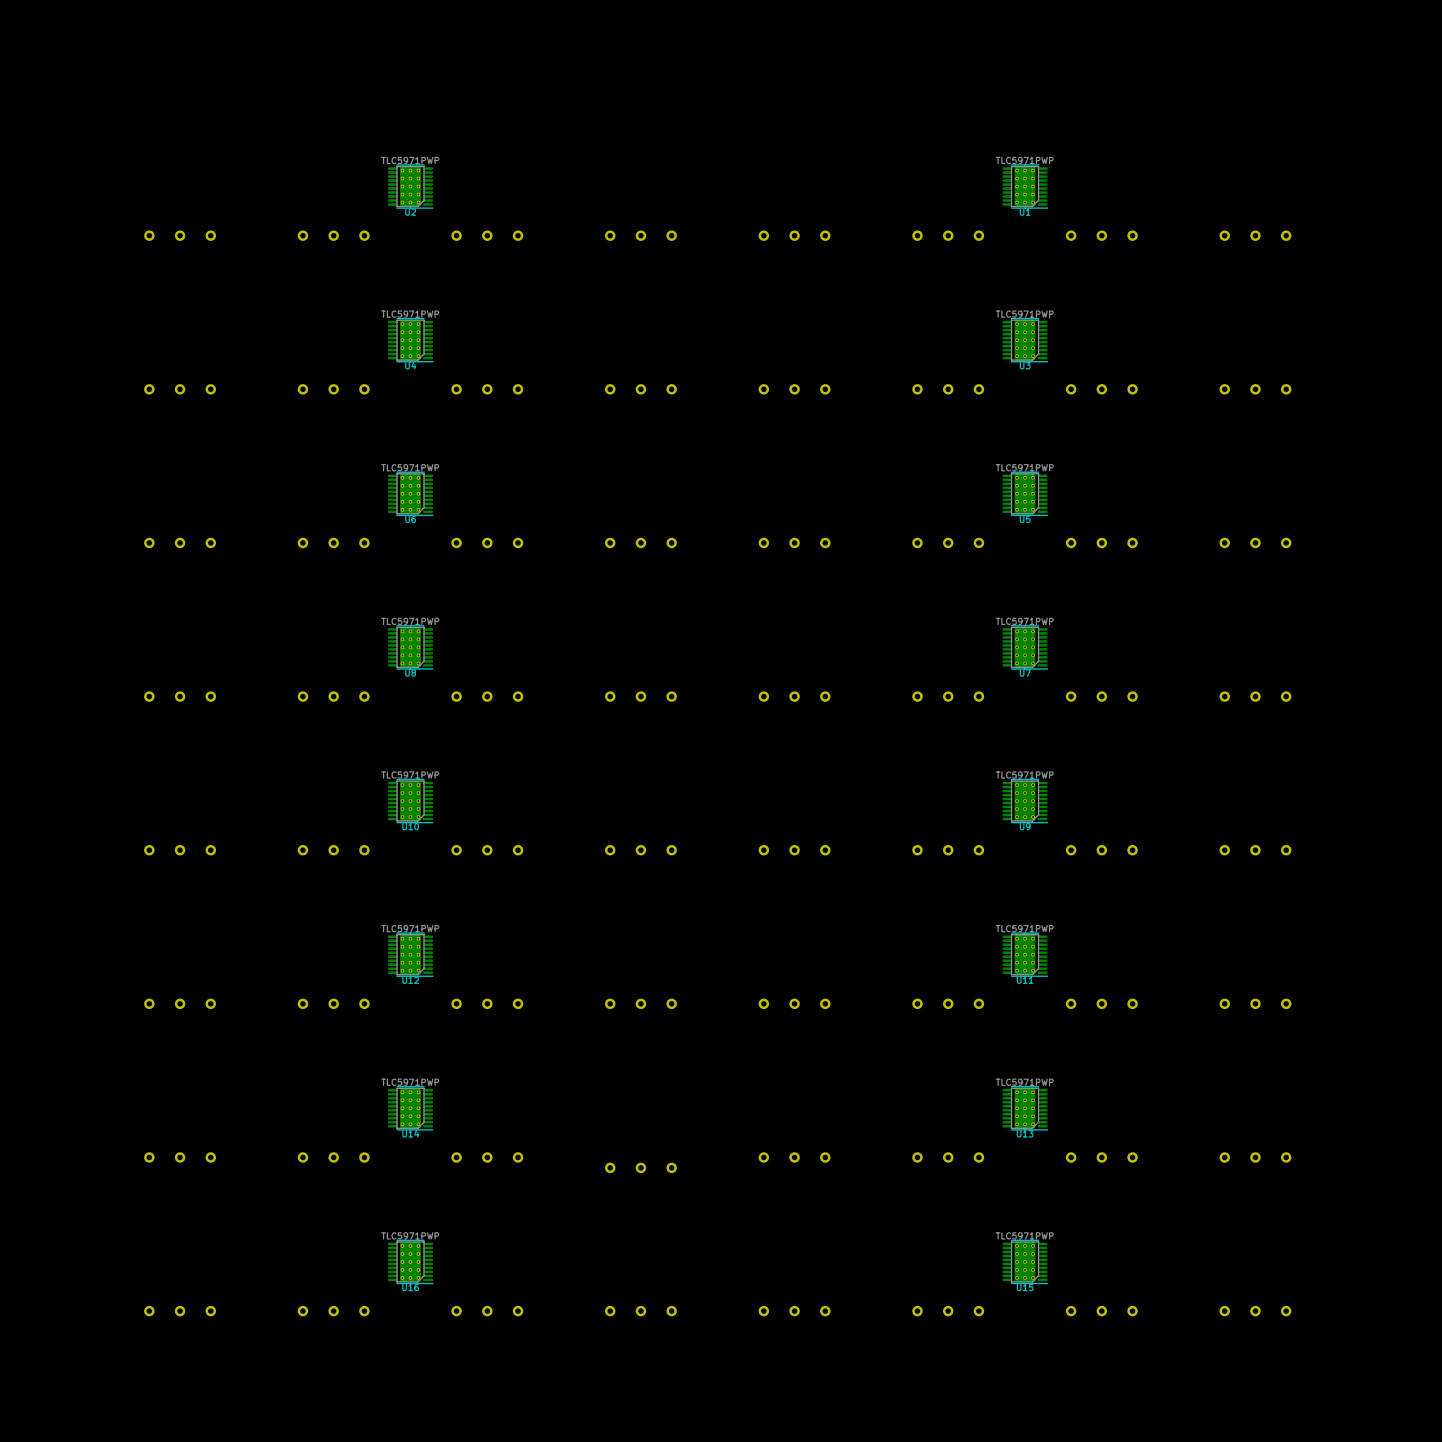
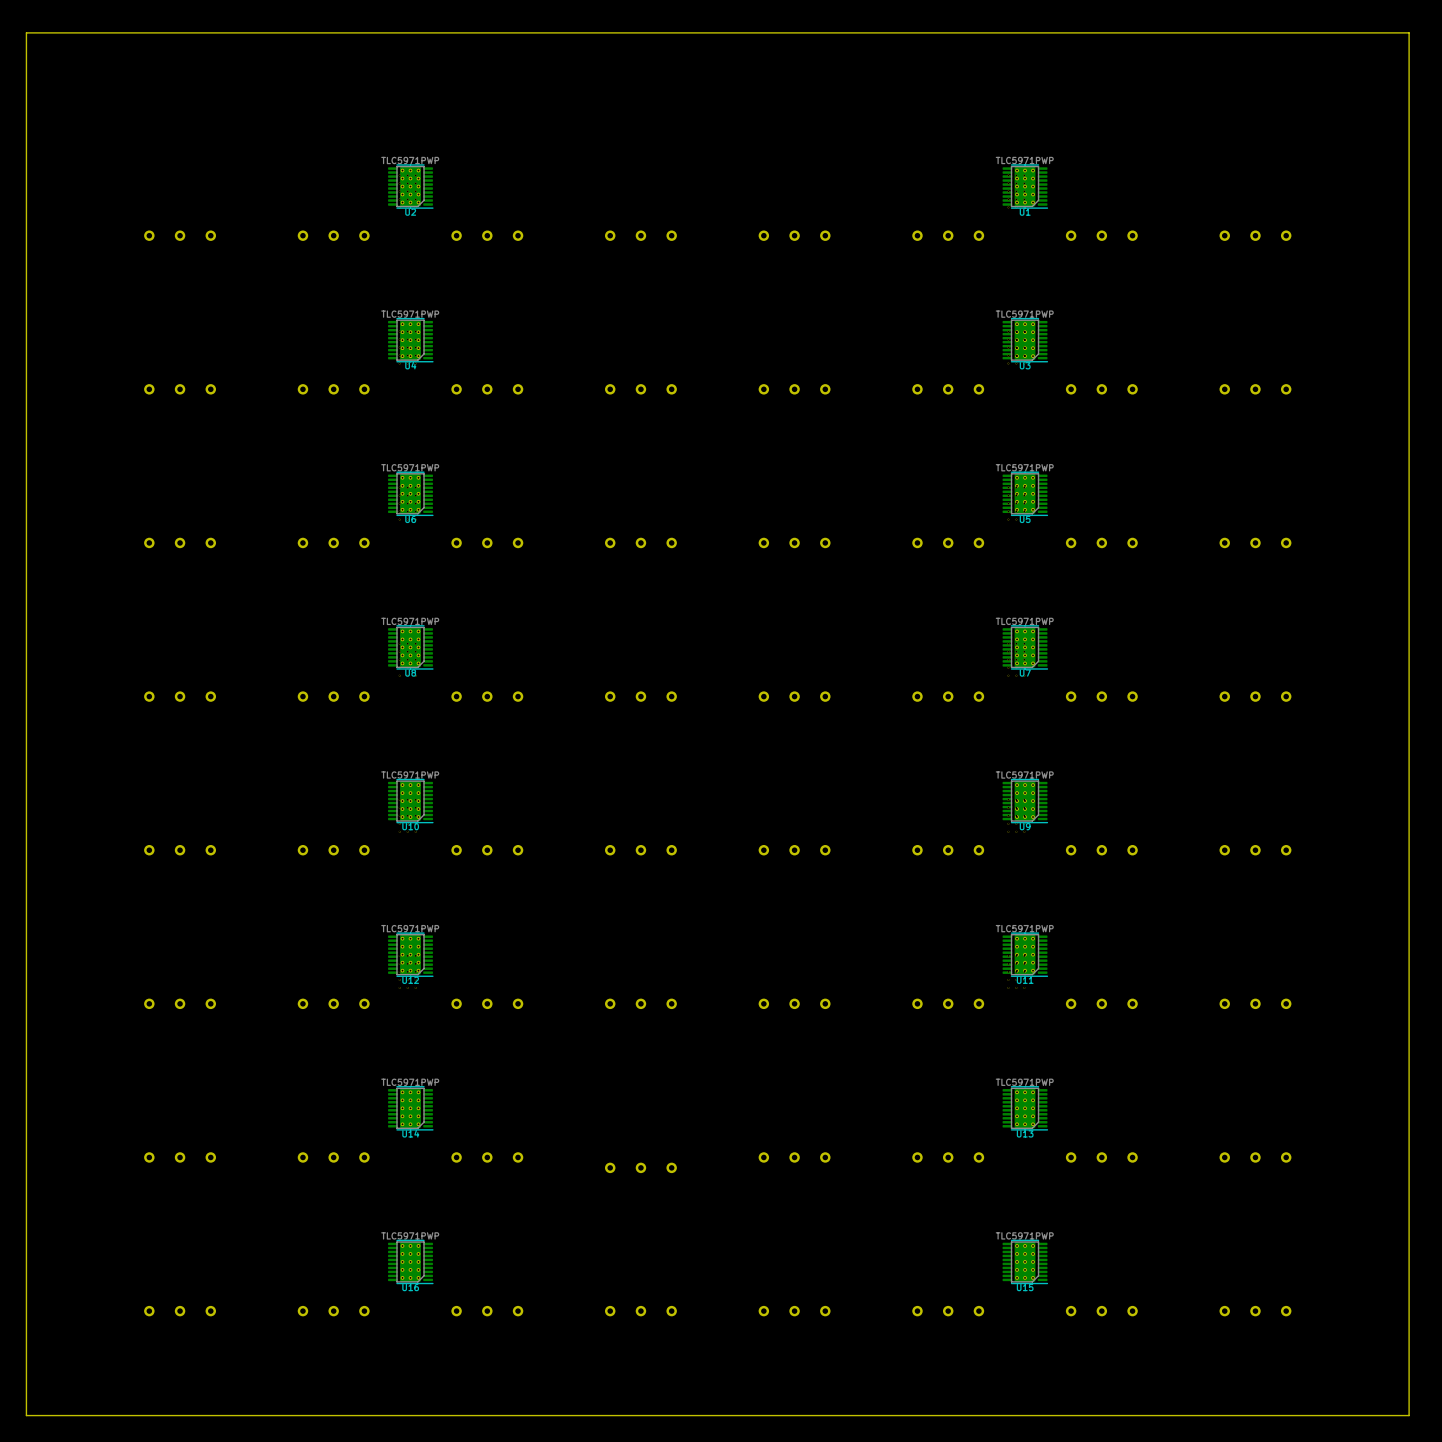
board edge: none -> (1409, 32) (1409, 1415) (26, 1415) (26, 32) (1409, 32)
part: none -> (407, 191)
part: none -> (1016, 191)
part: none -> (407, 347)
part: none -> (1016, 347)
part: none -> (407, 503)
part: none -> (1016, 503)
part: none -> (407, 659)
part: none -> (1016, 659)
part: none -> (407, 815)
part: none -> (1016, 815)
part: none -> (407, 971)
part: none -> (1016, 971)

